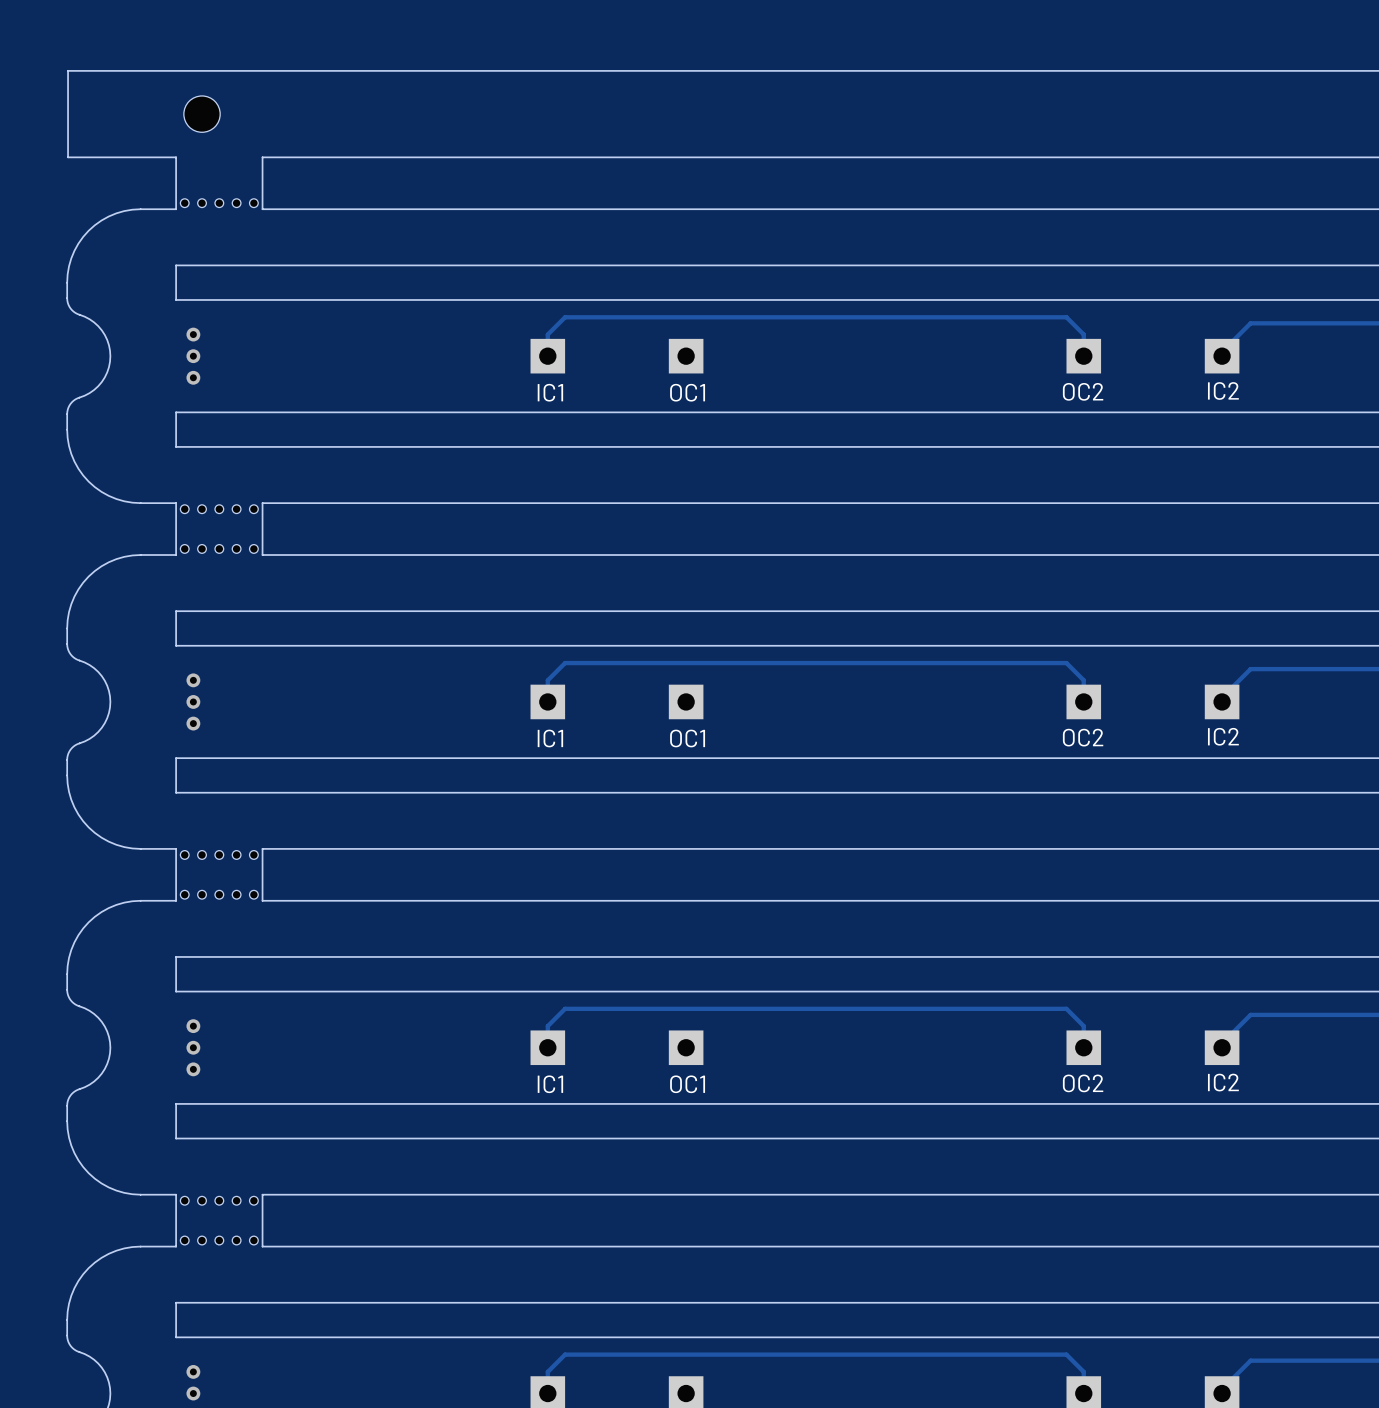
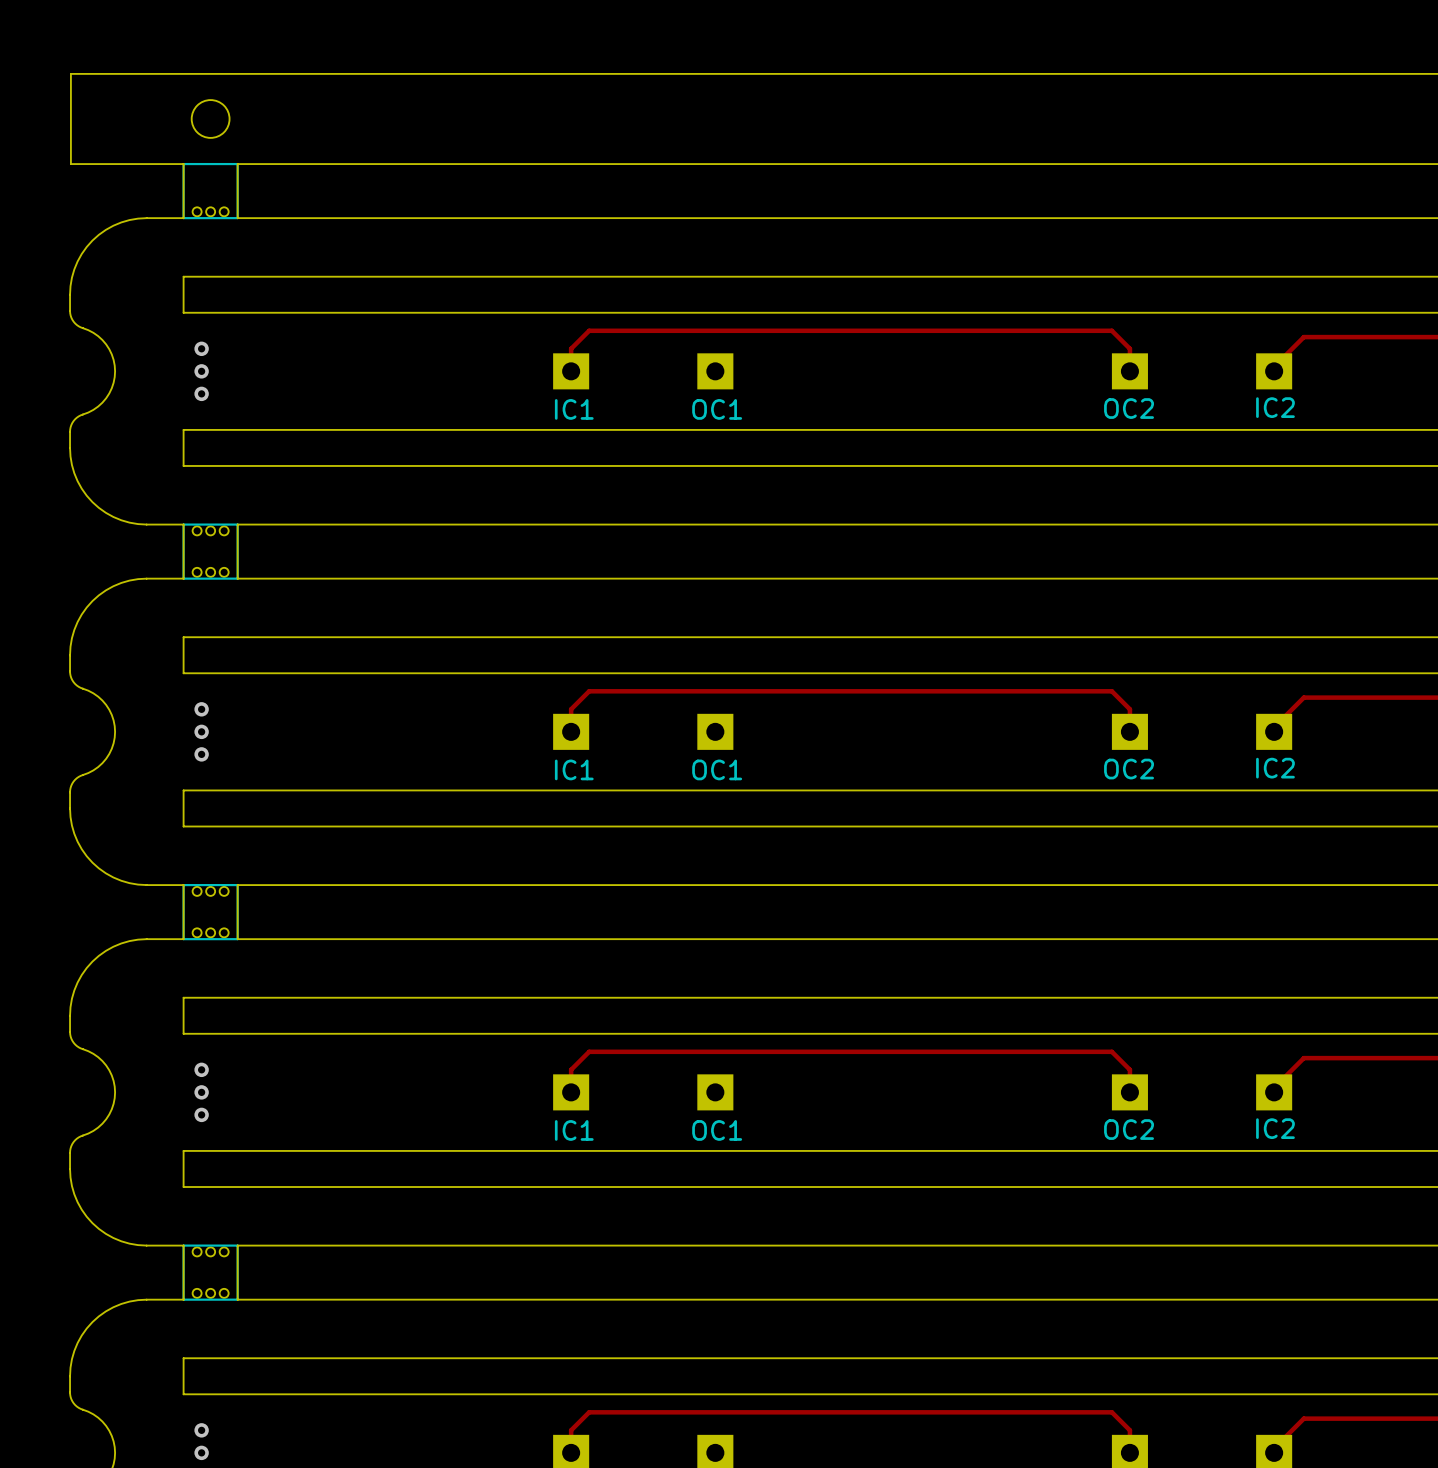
board edge: (262, 157) (262, 209) -> (273, 164) (237, 164) (237, 218) (273, 218)
part: none -> (210, 191)
part: (219, 203) -> none
board edge: (262, 503) (262, 555) -> (273, 524) (237, 524) (237, 578) (273, 578)
part footprint: [180, 504, 259, 554] -> [182, 523, 239, 580]
board edge: (262, 848) (262, 900) -> (273, 885) (237, 885) (237, 939) (273, 939)
part footprint: [180, 850, 259, 900] -> [182, 883, 239, 941]
board edge: (262, 1194) (262, 1246) -> (273, 1245) (237, 1245) (237, 1299) (273, 1299)
part footprint: [180, 1196, 259, 1245] -> [182, 1244, 239, 1301]

